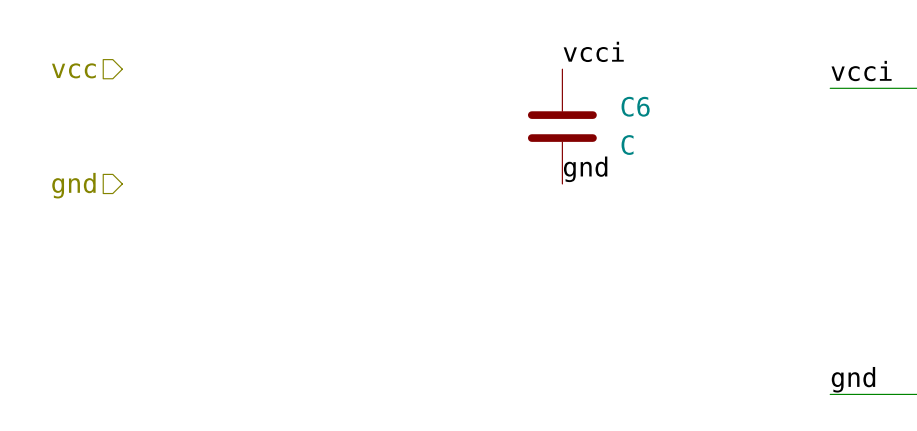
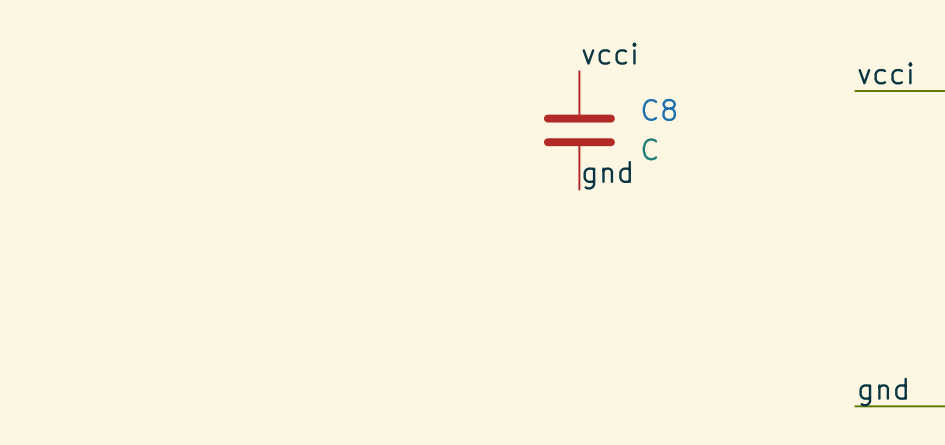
hierarchical label: vcc (73, 70) -> none
C6 name: C6 (635, 106) -> C8 (659, 109)
hierarchical label: gnd (73, 185) -> none

